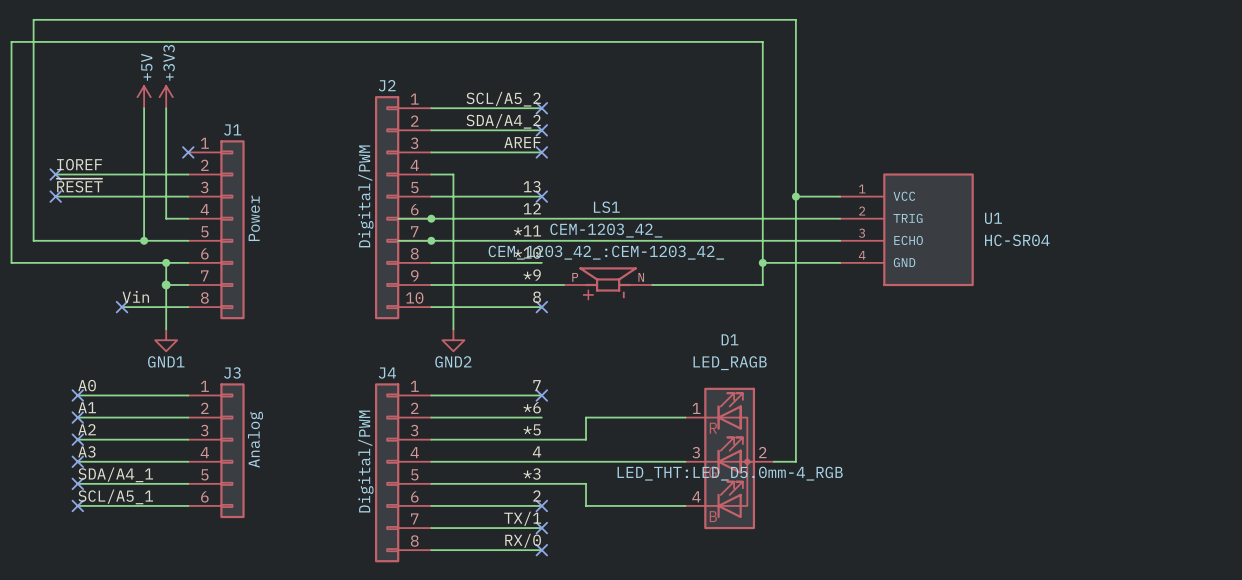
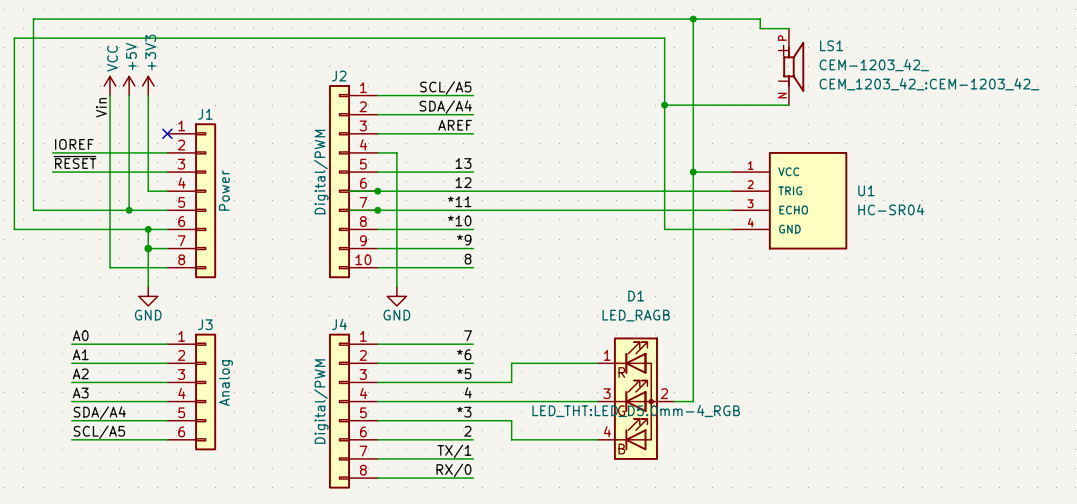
wire: none -> (693, 19) (760, 19) (760, 28) (788, 28)
junction: none -> (693, 19)
power symbol: none -> VCC (110, 86)
label: SCL/A5_2 (503, 99) -> SCL/A5 (445, 87)
wire: none -> (110, 95) (110, 267)
no-connect mark: (541, 108) -> none
wire: none -> (664, 105) (788, 105)
junction: none -> (664, 105)
label: SDA/A4_2 (503, 121) -> SDA/A4 (445, 107)
no-connect mark: (541, 130) -> none
no-connect mark: (541, 152) -> none
no-connect mark: (55, 174) -> none
no-connect mark: (55, 196) -> none
no-connect mark: (541, 196) -> none
LS1 name position: LS1 (606, 207) -> LS1 (831, 45)
LS1 value position: CEM-1203_42_ (606, 230) -> CEM-1203_42_ (874, 65)
LS1 text position: CEM_1203_42_:CEM-1203_42_ (606, 252) -> CEM_1203_42_:CEM-1203_42_ (929, 84)
wire: (762, 262) (762, 284) (652, 284) -> none
junction: (762, 262) -> none
LS1 rotation: 0° (608, 279) -> 90° clockwise (793, 66)
LS1 position: (608, 279) -> (793, 66)
wire: (541, 284) (563, 284) -> none
label rotation: 0° (135, 296) -> 90° counterclockwise (101, 107)
label position: Vin (135, 296) -> Vin (101, 107)
no-connect mark: (121, 307) -> none
no-connect mark: (541, 307) -> none
power symbol: GND1 (166, 340) -> GND (148, 296)
power symbol: GND2 (453, 340) -> GND (396, 296)
no-connect mark: (77, 395) -> none
no-connect mark: (541, 395) -> none
no-connect mark: (77, 417) -> none
no-connect mark: (77, 439) -> none
no-connect mark: (77, 461) -> none
label: SDA/A4_1 (115, 474) -> SDA/A4 (99, 413)
no-connect mark: (77, 483) -> none
label: SCL/A5_1 (115, 496) -> SCL/A5 (99, 432)
no-connect mark: (77, 505) -> none
no-connect mark: (541, 505) -> none
no-connect mark: (541, 528) -> none
no-connect mark: (541, 550) -> none

